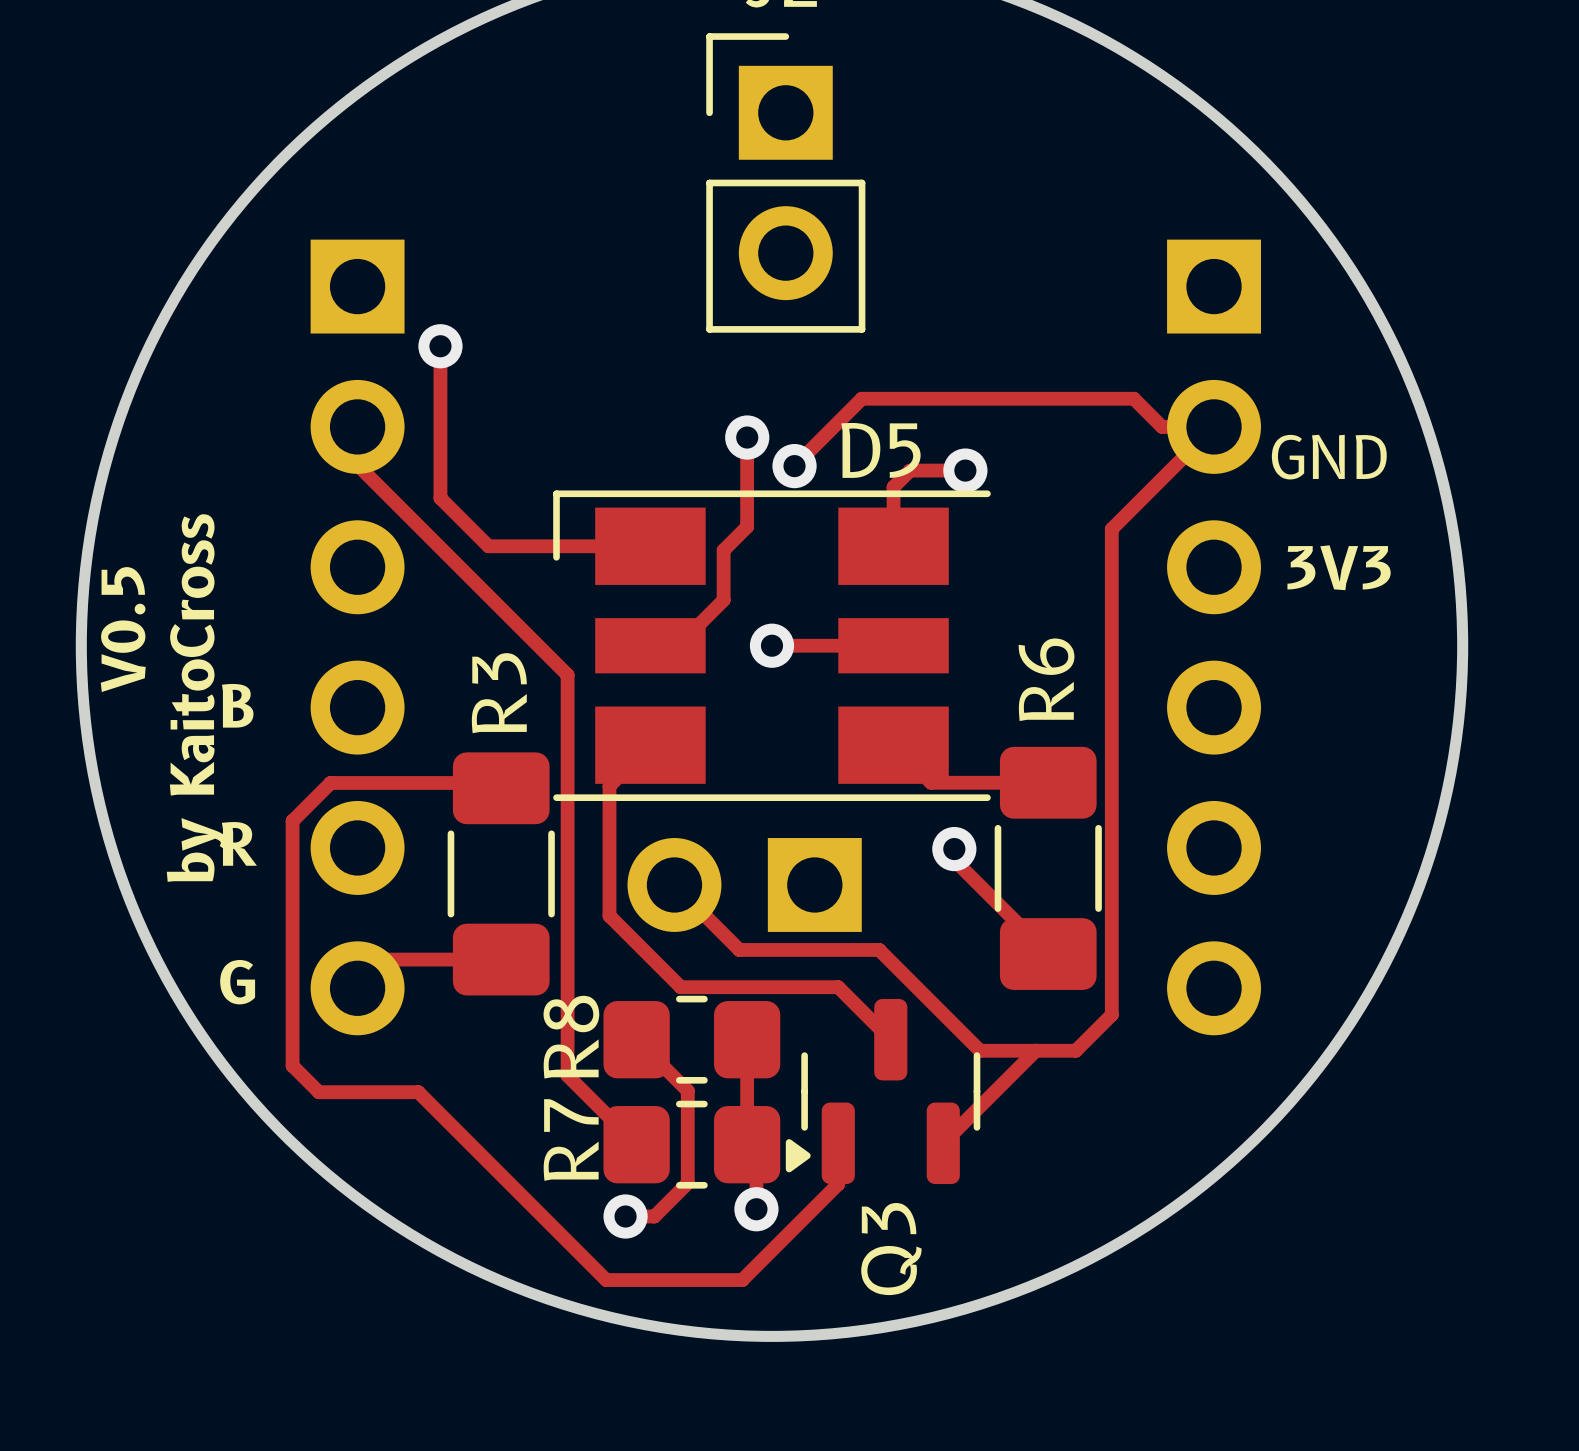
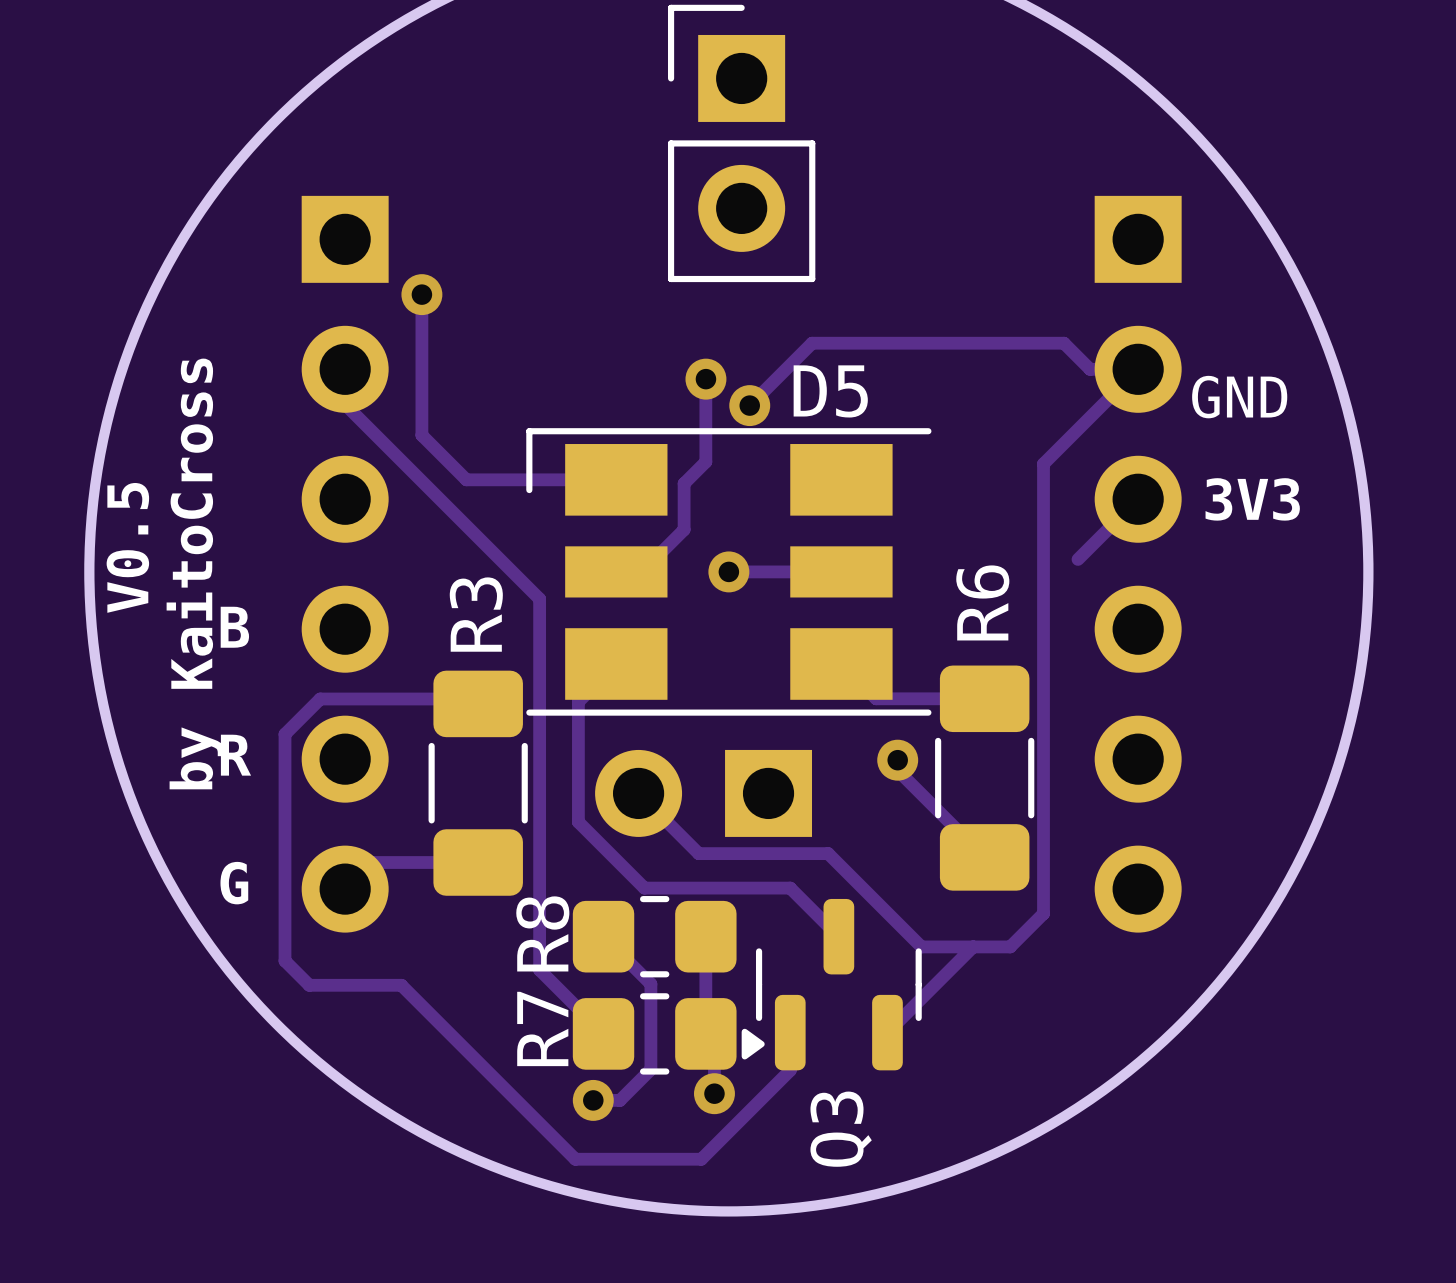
track: (965, 470) (910, 470) (893, 487) (893, 546) -> none
via: (965, 470) -> none
track: none -> (1138, 499) (1077, 559)

